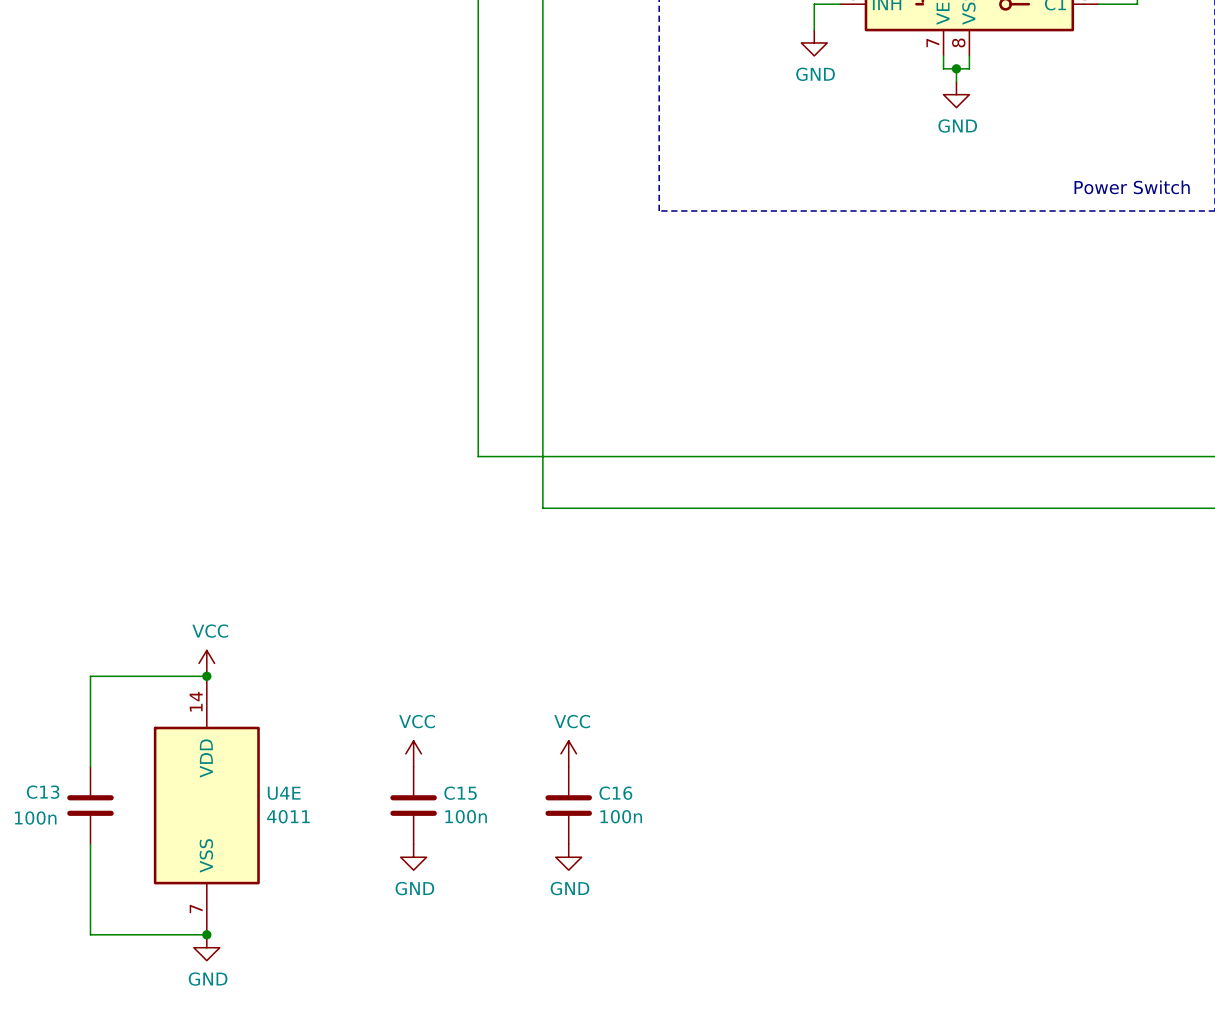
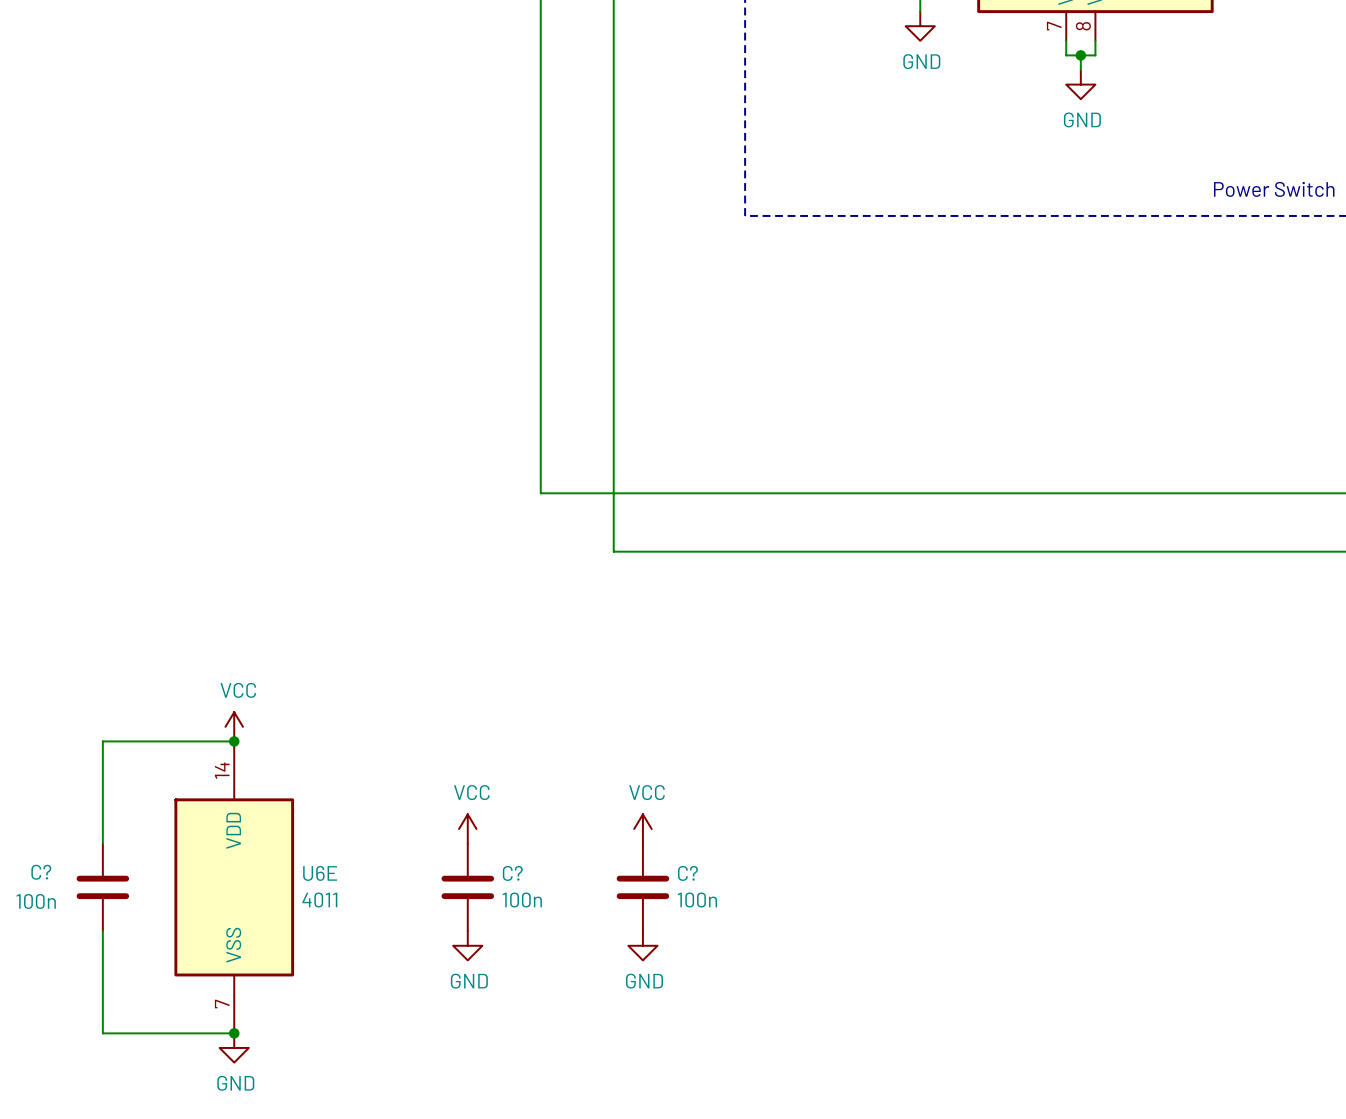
C13 name: C13 (43, 792) -> C? (41, 872)
U4E name: U4E (284, 793) -> U6E (320, 873)
C15 name: C15 (460, 793) -> C? (512, 873)
C16 name: C16 (615, 793) -> C? (687, 873)

